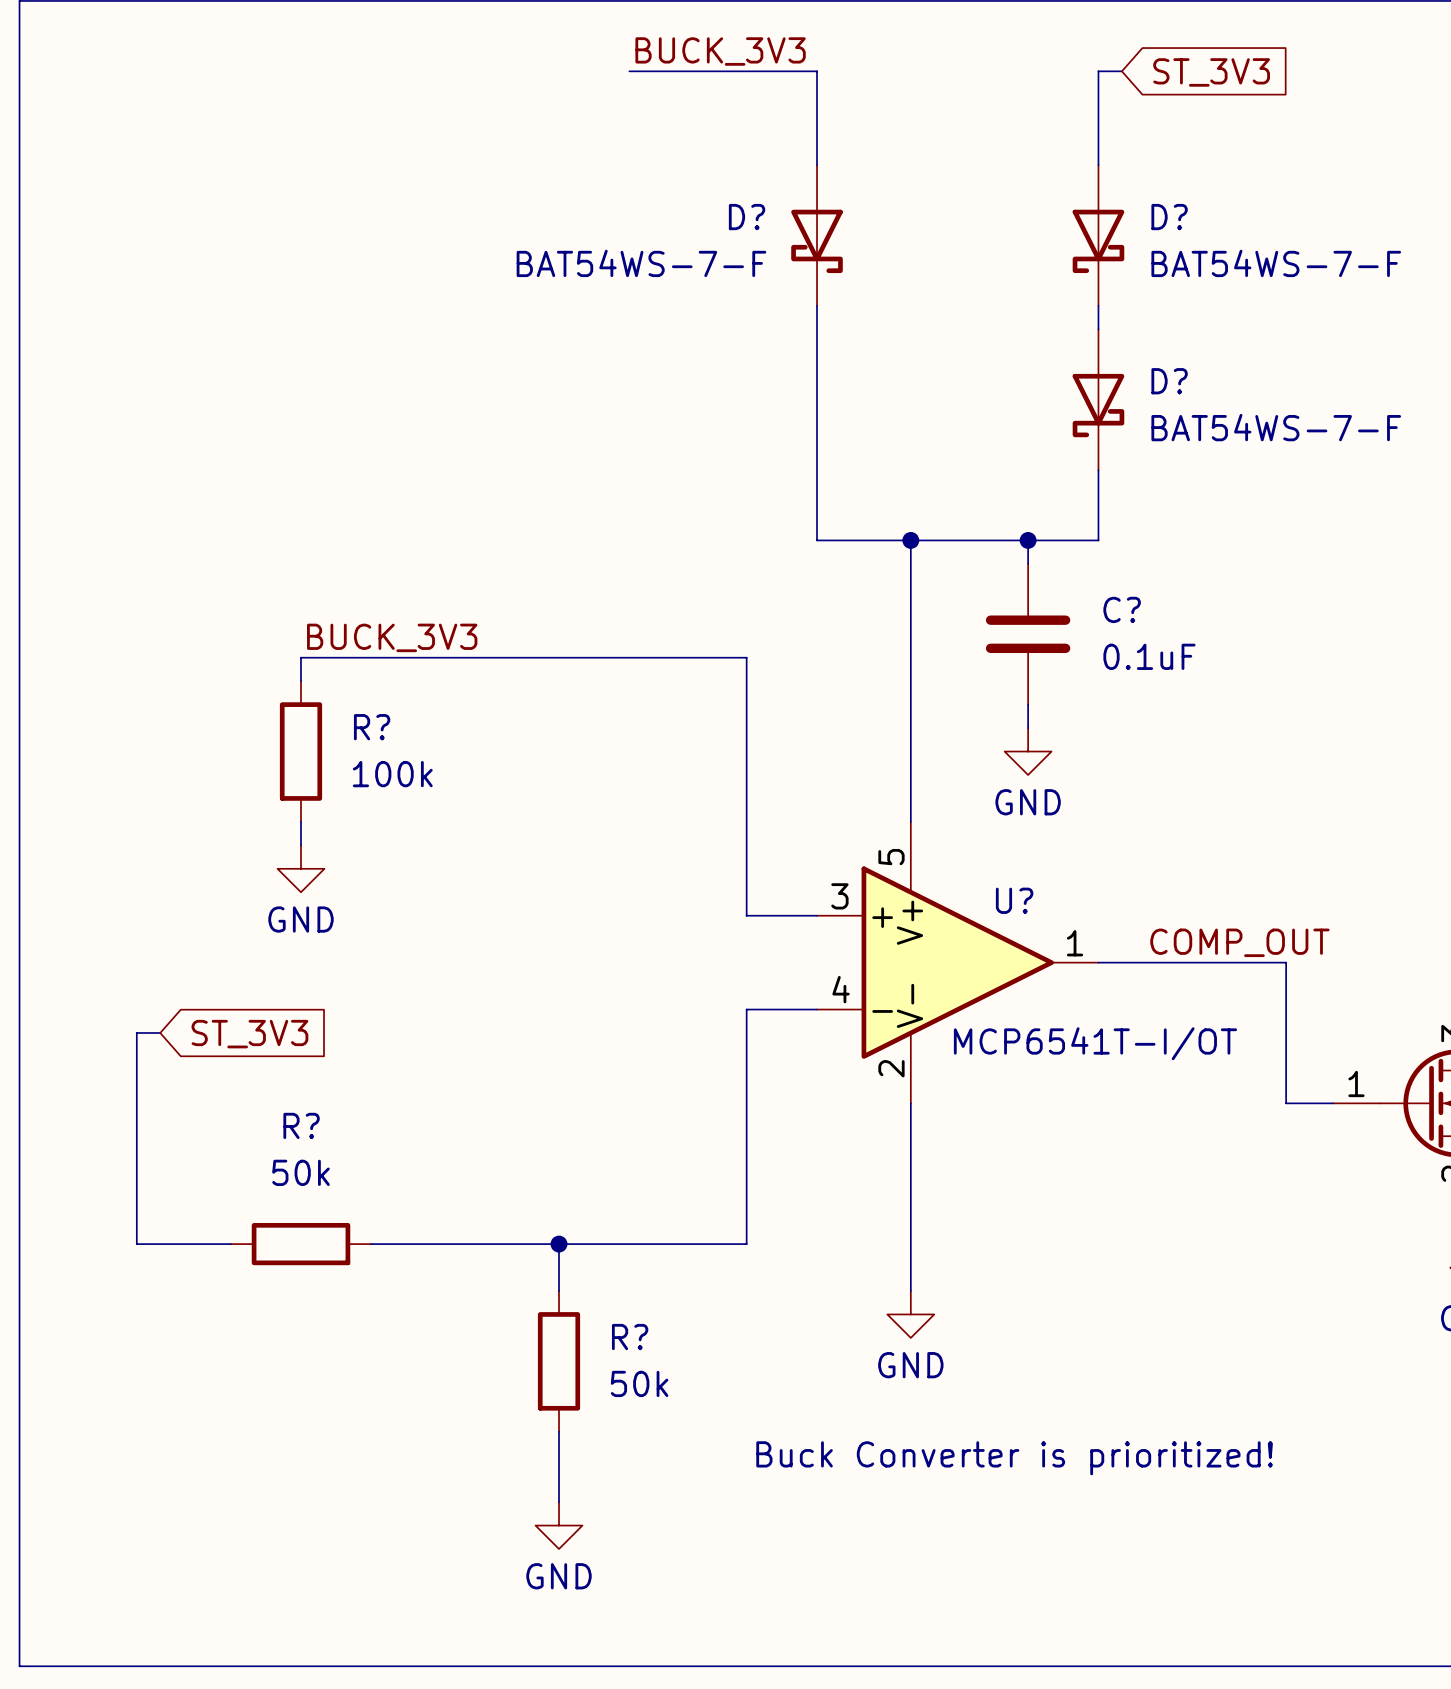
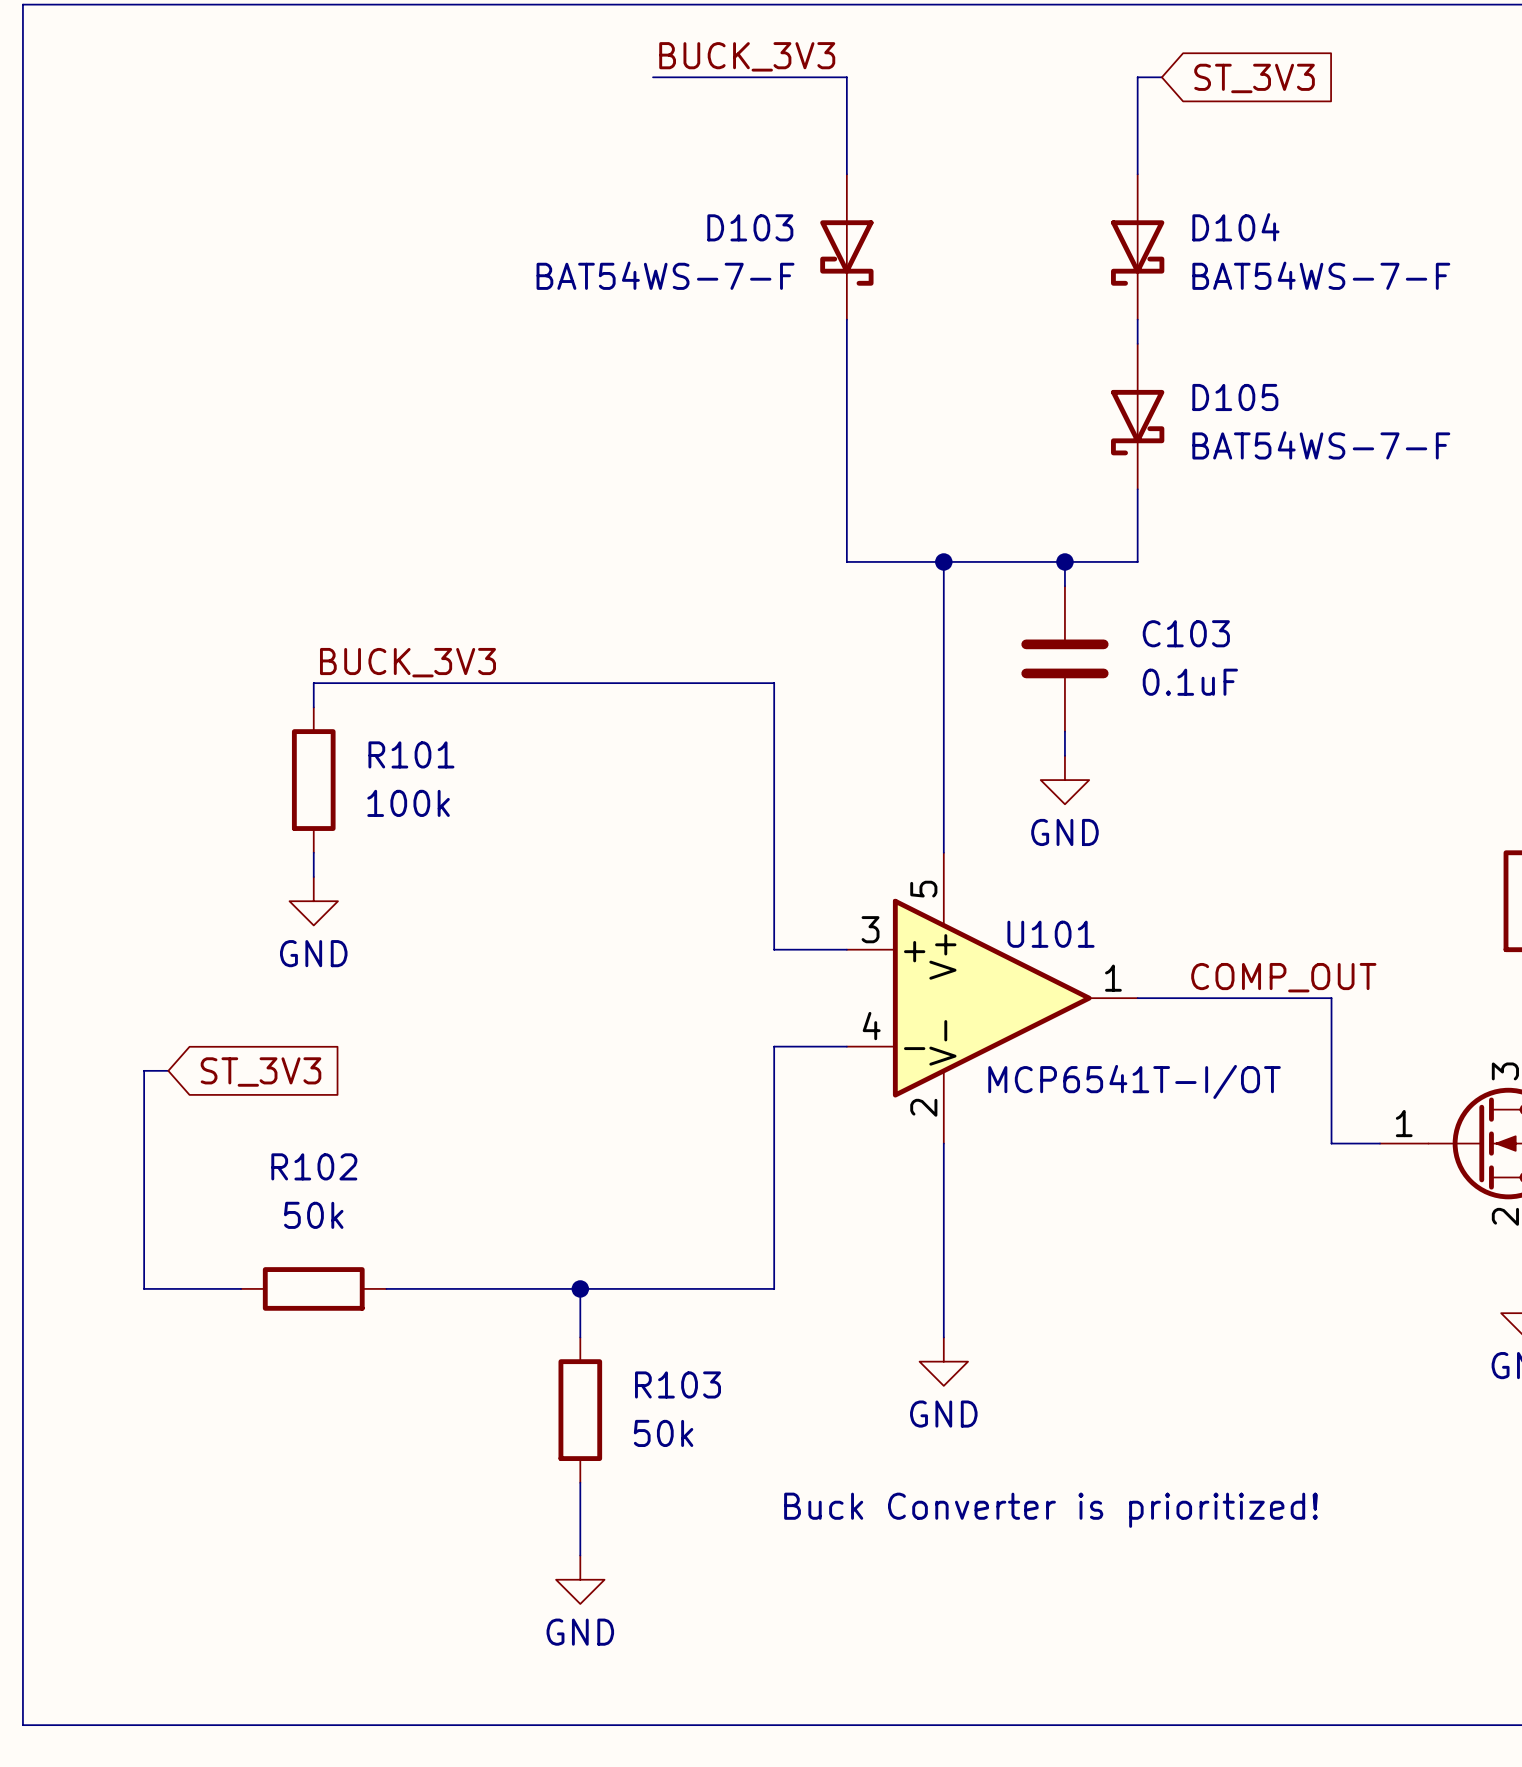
D? name: D? (747, 217) -> D103 (750, 227)
D? name: D? (1169, 217) -> D104 (1235, 227)
D? name: D? (1169, 381) -> D105 (1235, 397)
C? name: C? (1122, 609) -> C103 (1186, 633)
R? name: R? (372, 727) -> R101 (411, 754)
U? name: U? (1014, 900) -> U101 (1051, 934)
R? name: R? (301, 1125) -> R102 (314, 1166)
R? name: R? (630, 1337) -> R103 (678, 1384)

